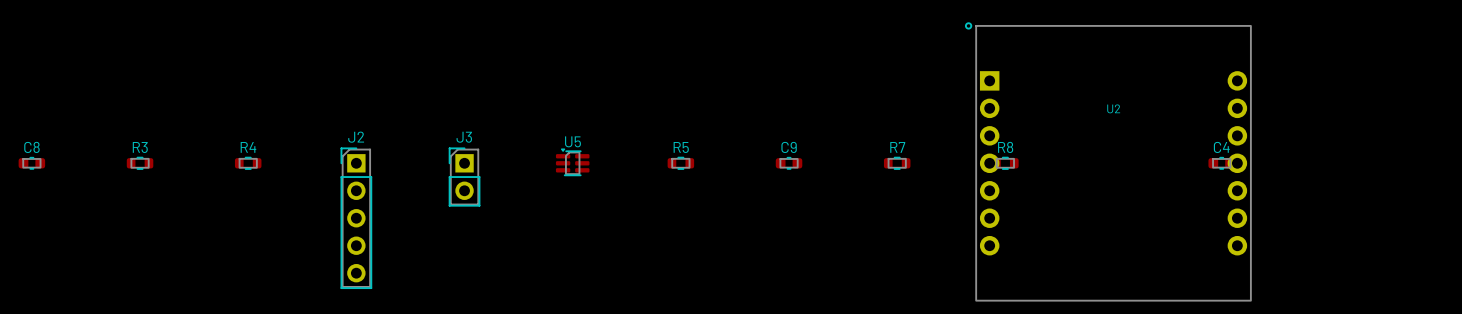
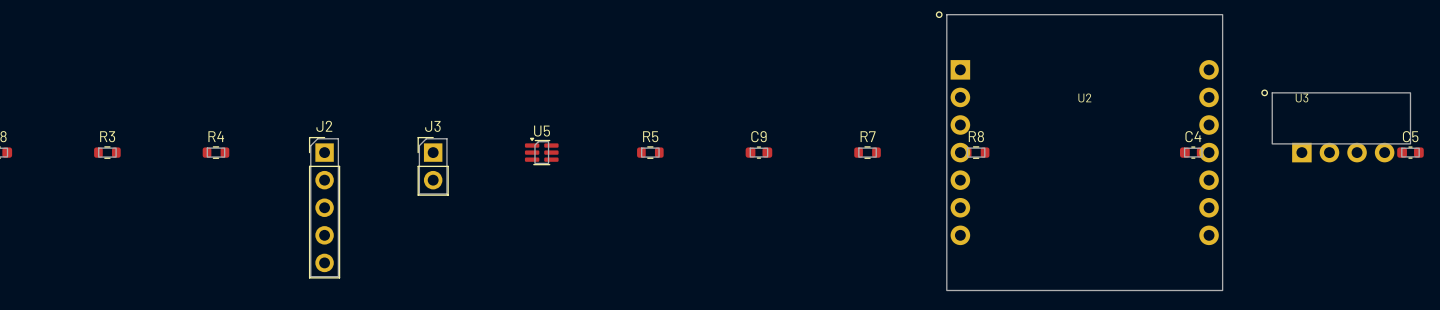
U3: none -> (1336, 125)
C5: none -> (1410, 152)

